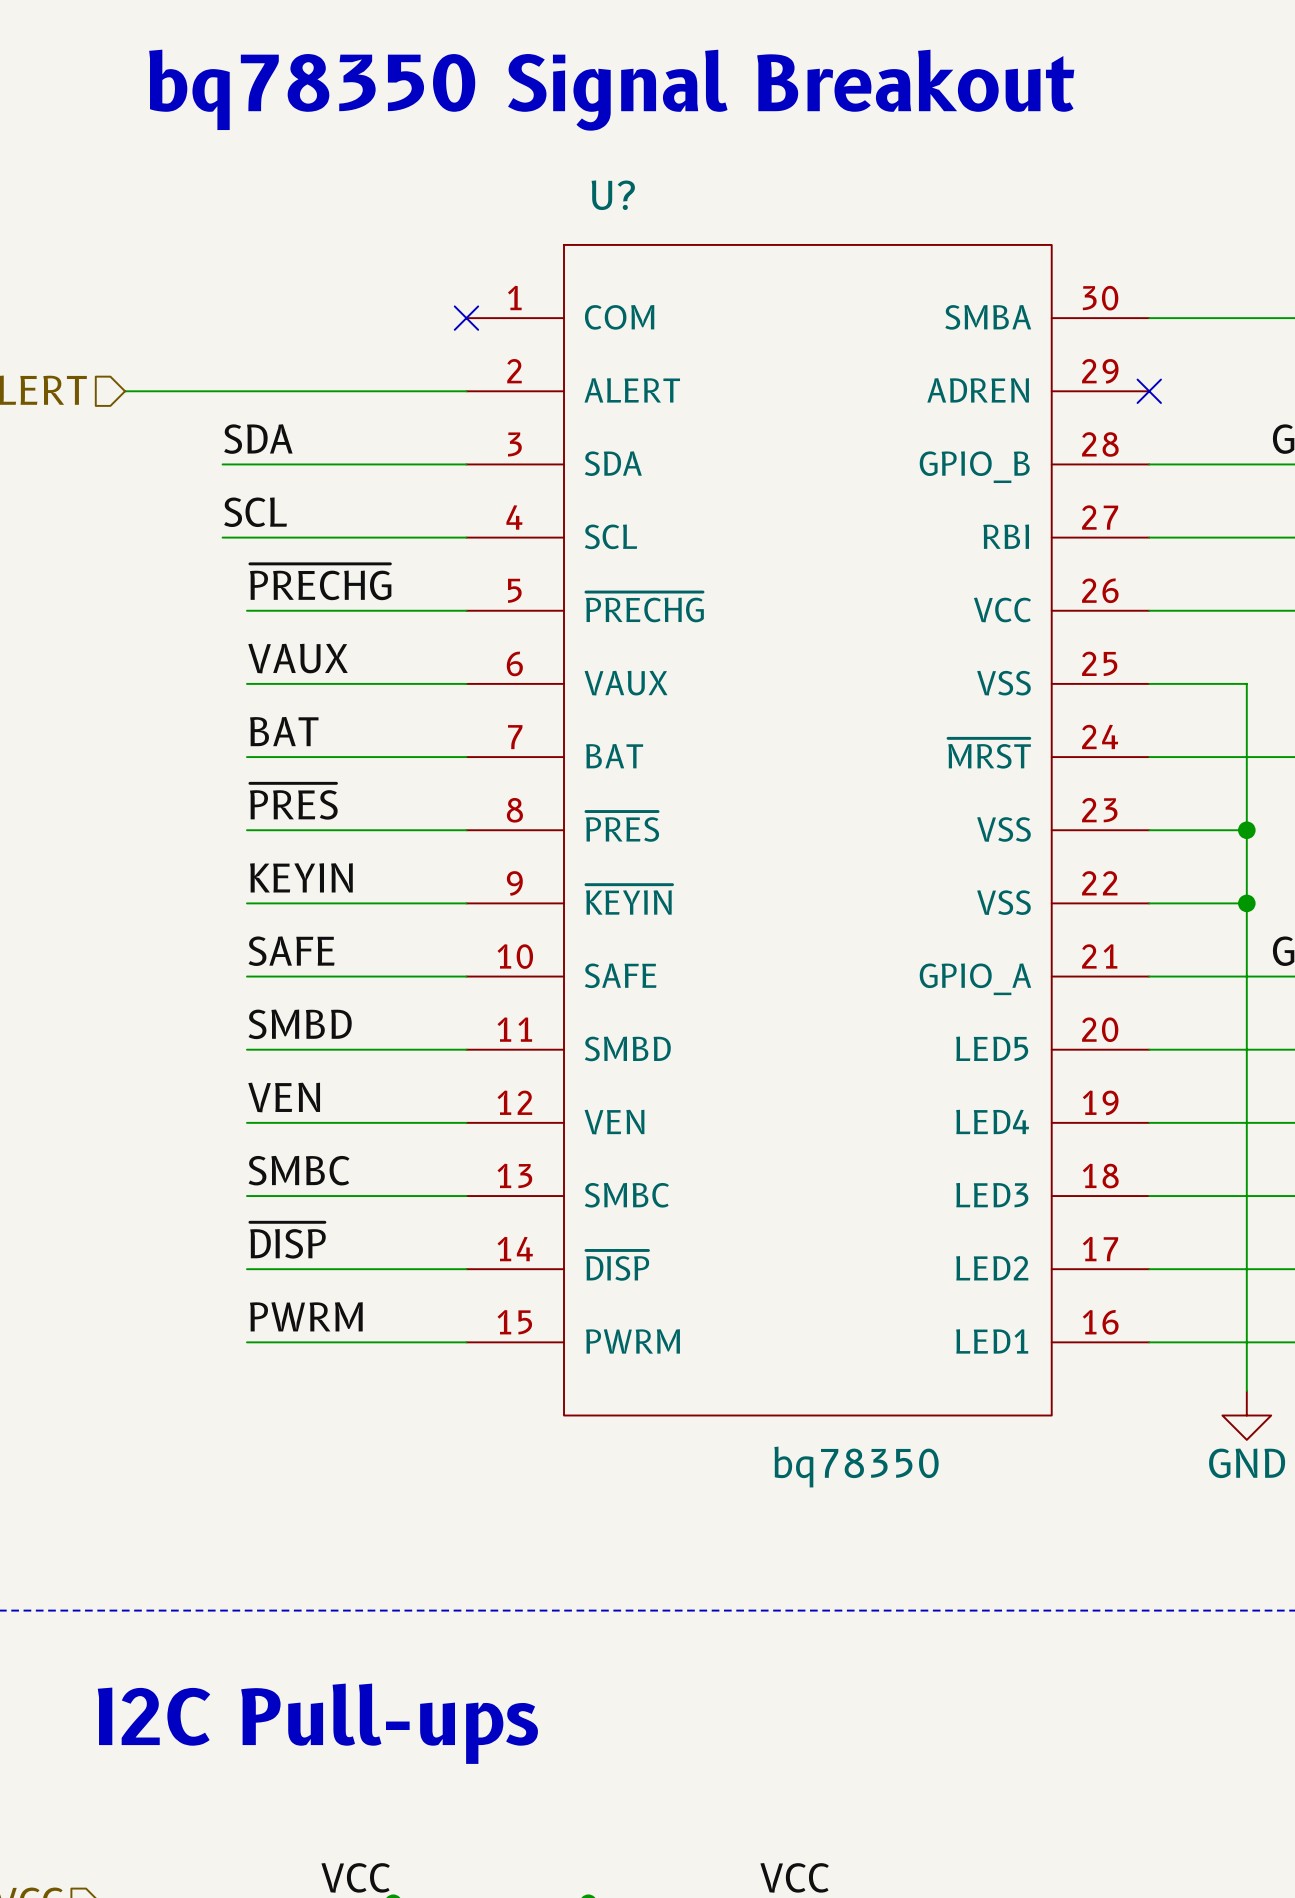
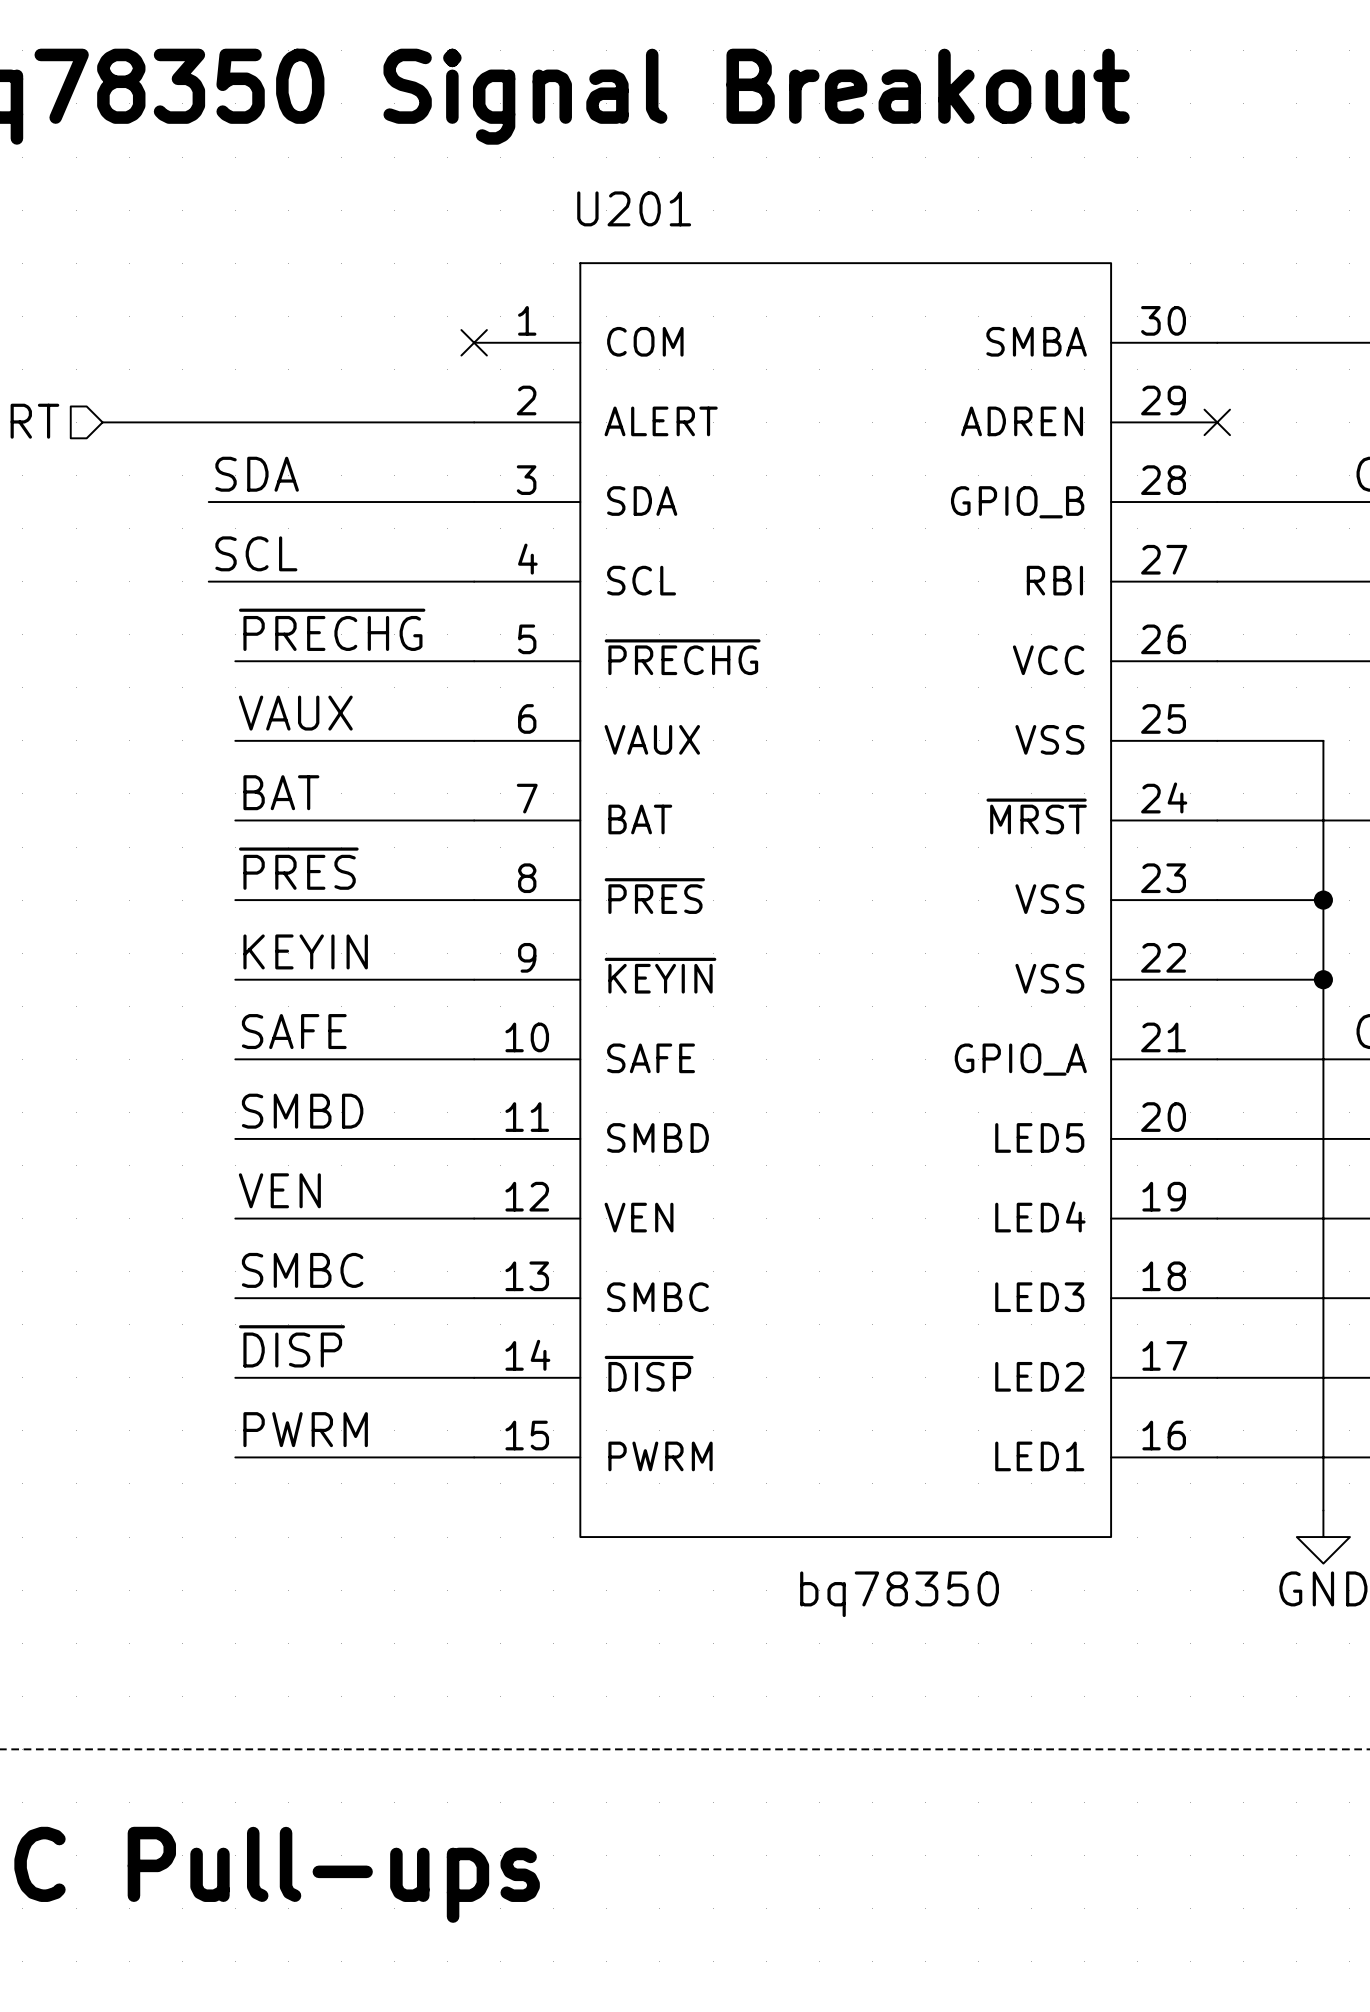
U? name: U? (613, 195) -> U201 (634, 208)

